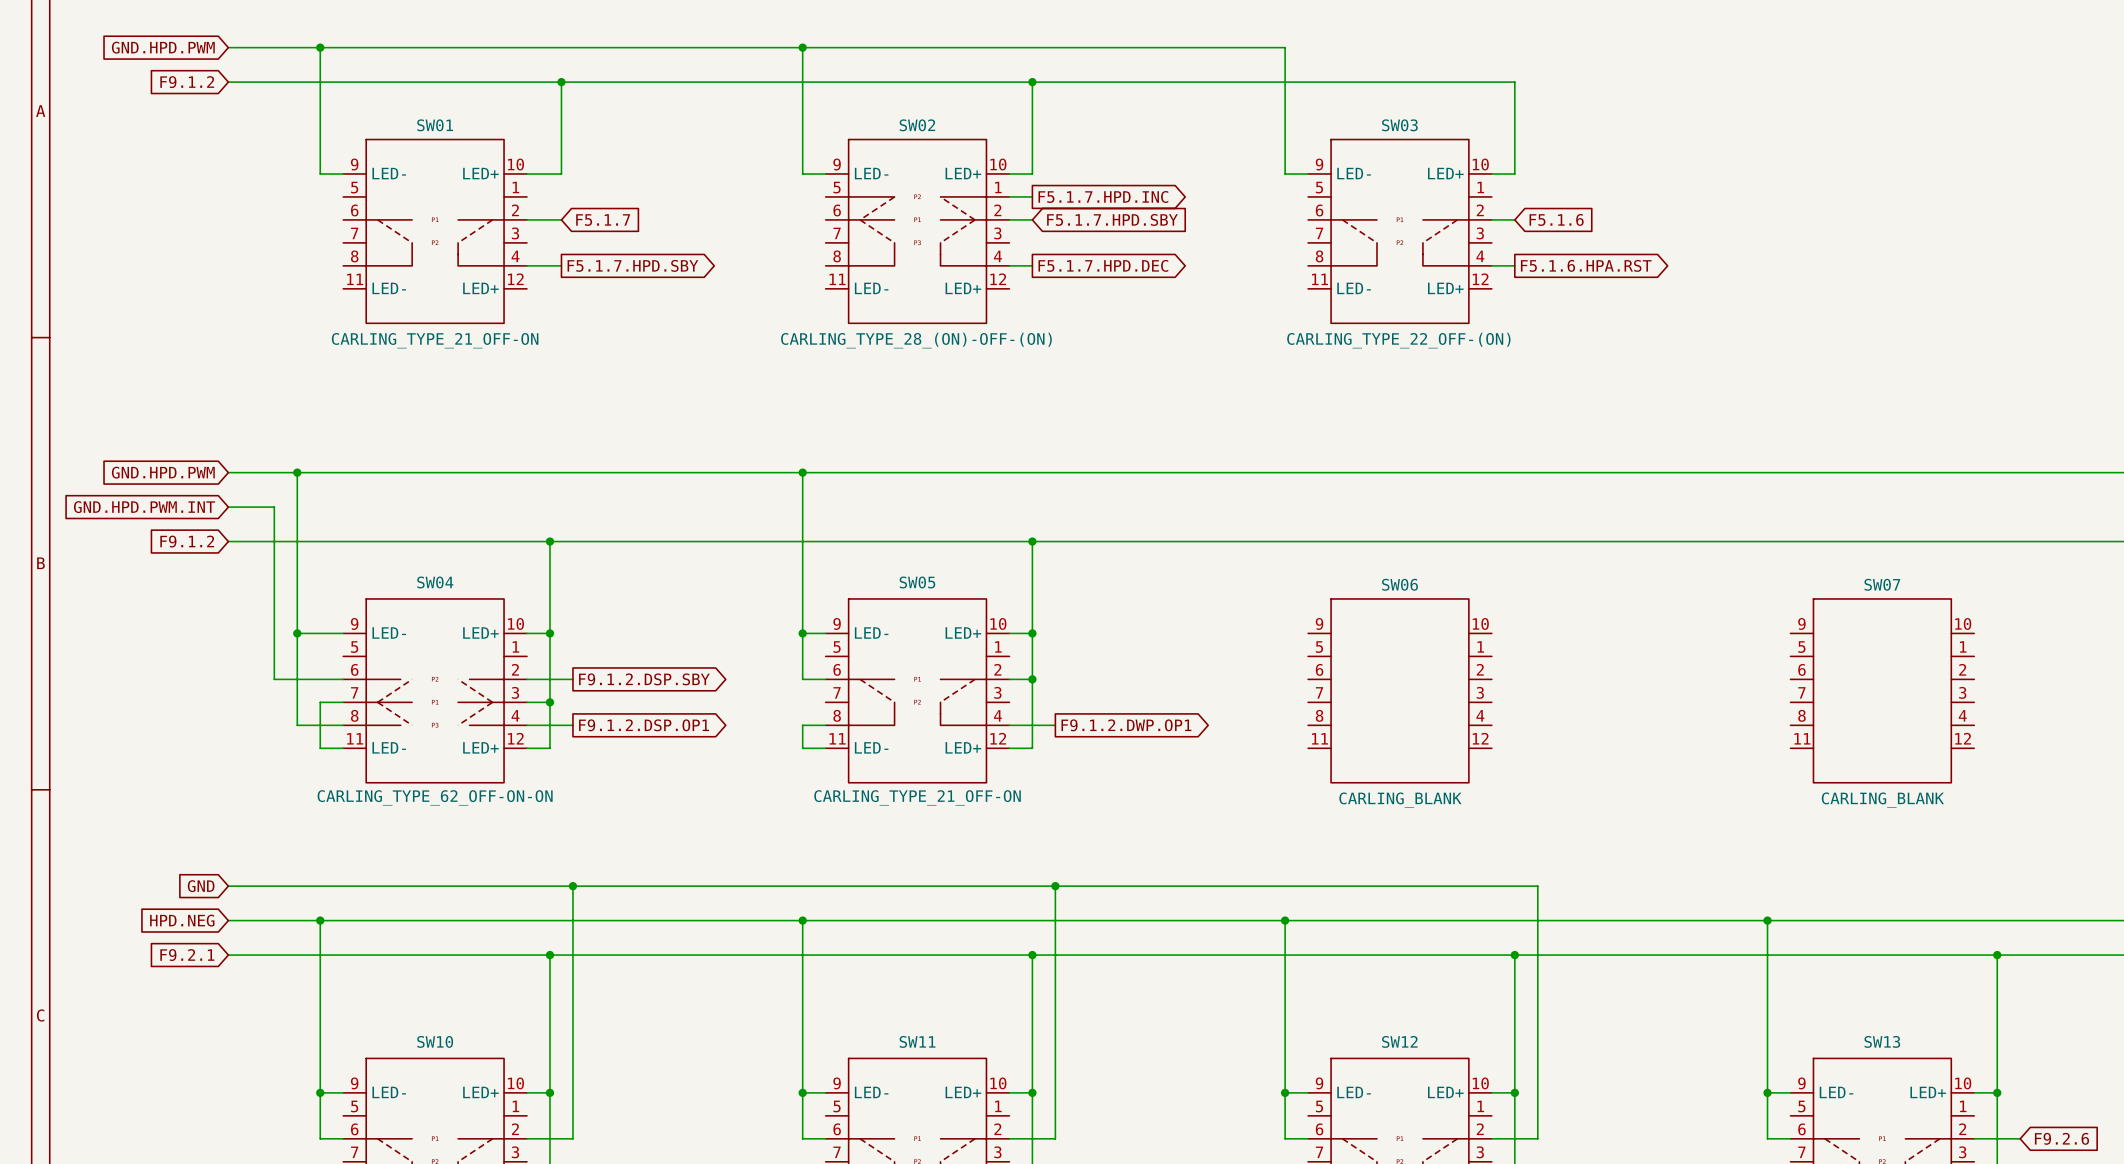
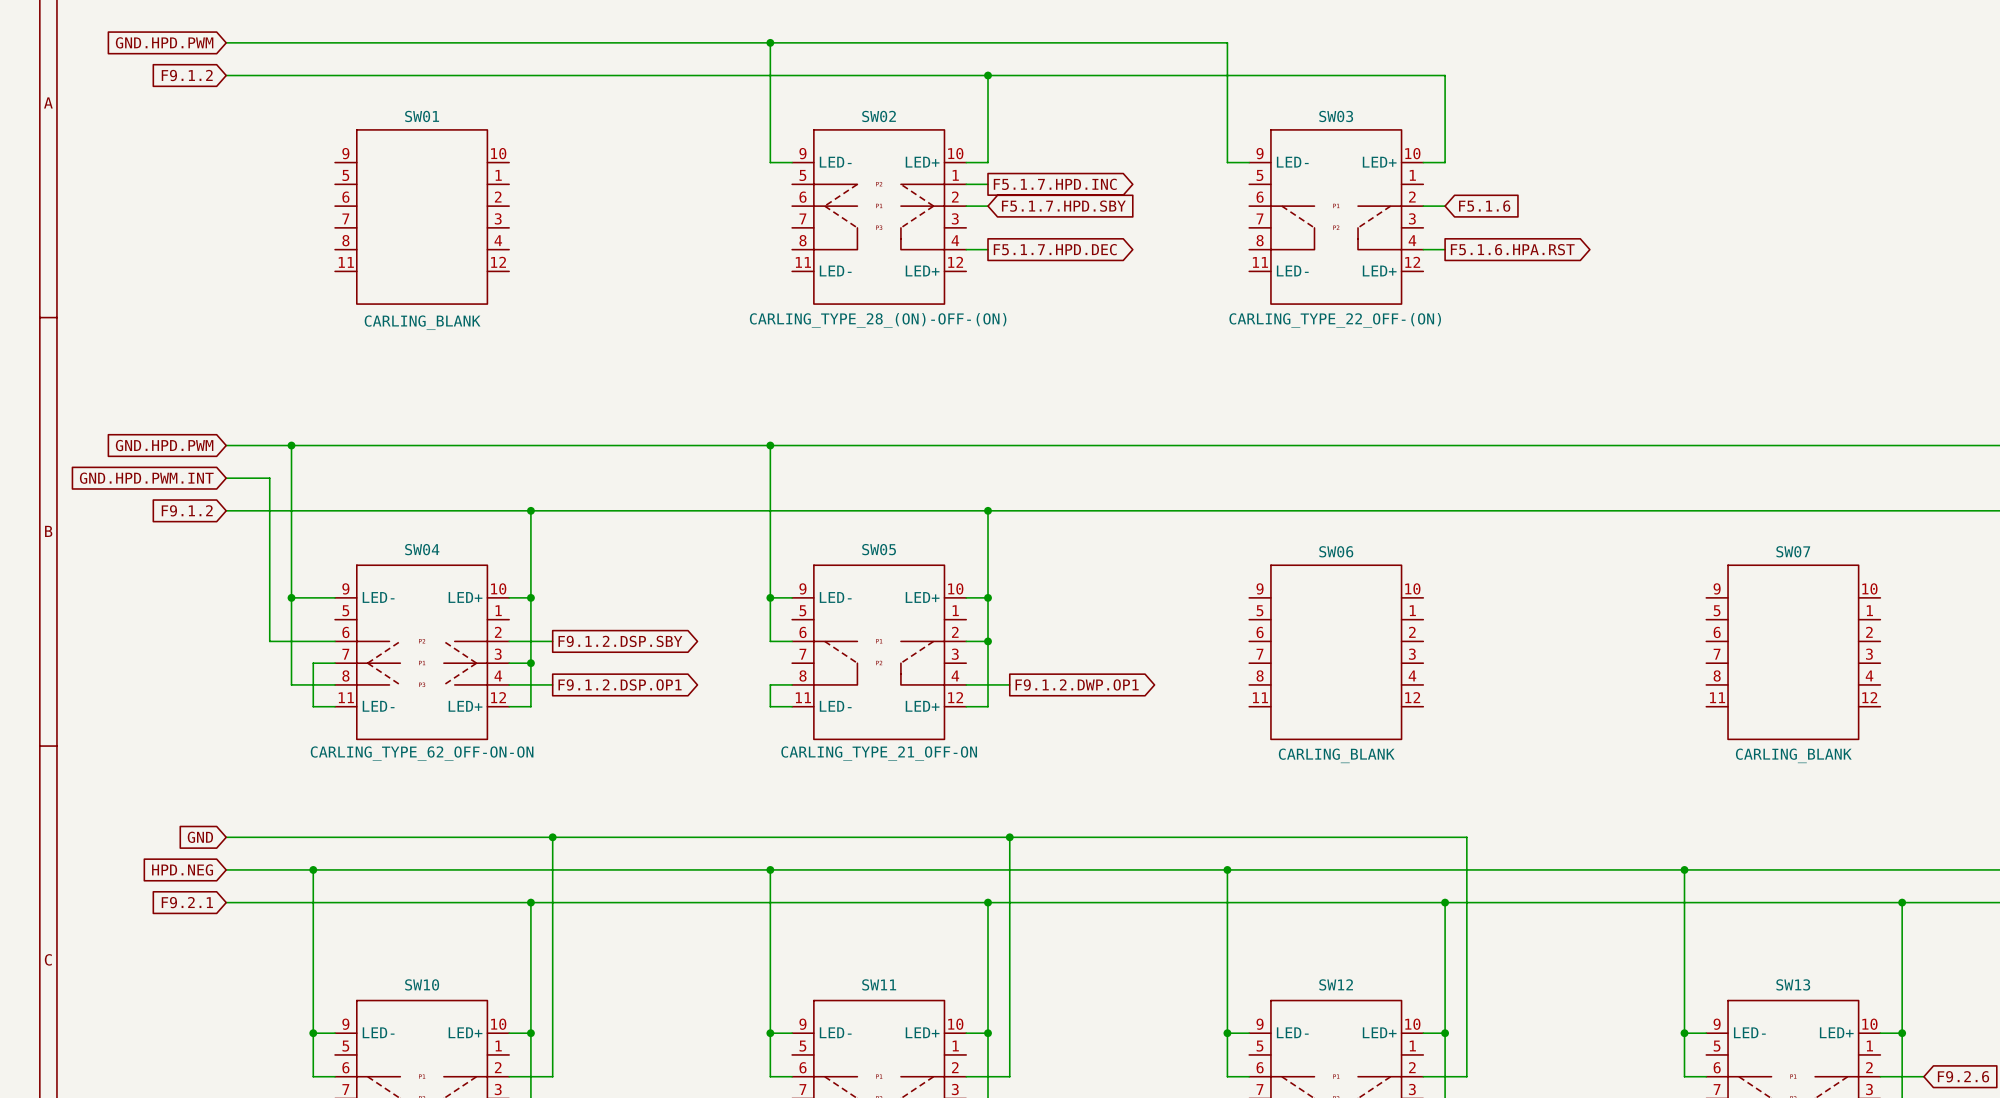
wire: (320, 47) (320, 173) (343, 173) -> none
junction: (320, 47) -> none
wire: (561, 82) (561, 173) (527, 173) -> none
junction: (561, 82) -> none
SW01 symbol: [343, 139, 528, 324] -> [335, 129, 510, 305]
wire: (527, 219) (561, 219) -> none
global label: F5.1.7 (603, 220) -> none
wire: (527, 265) (561, 265) -> none
global label: F5.1.7.HPD.SBY (632, 265) -> none
SW01 value: CARLING_TYPE_21_OFF-ON (435, 340) -> CARLING_BLANK (422, 322)

